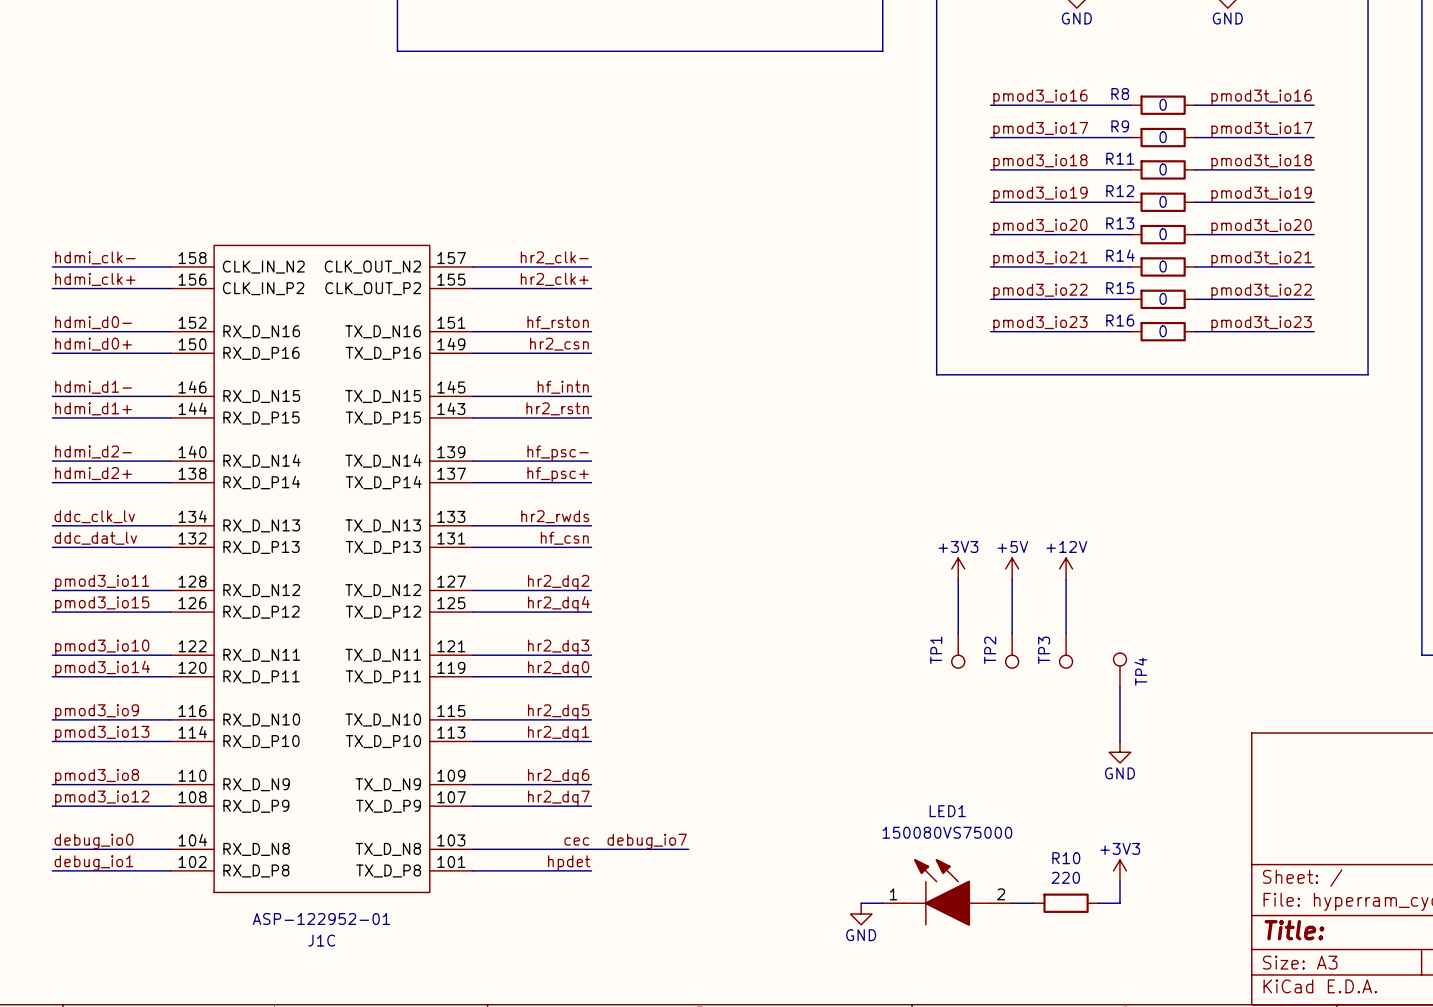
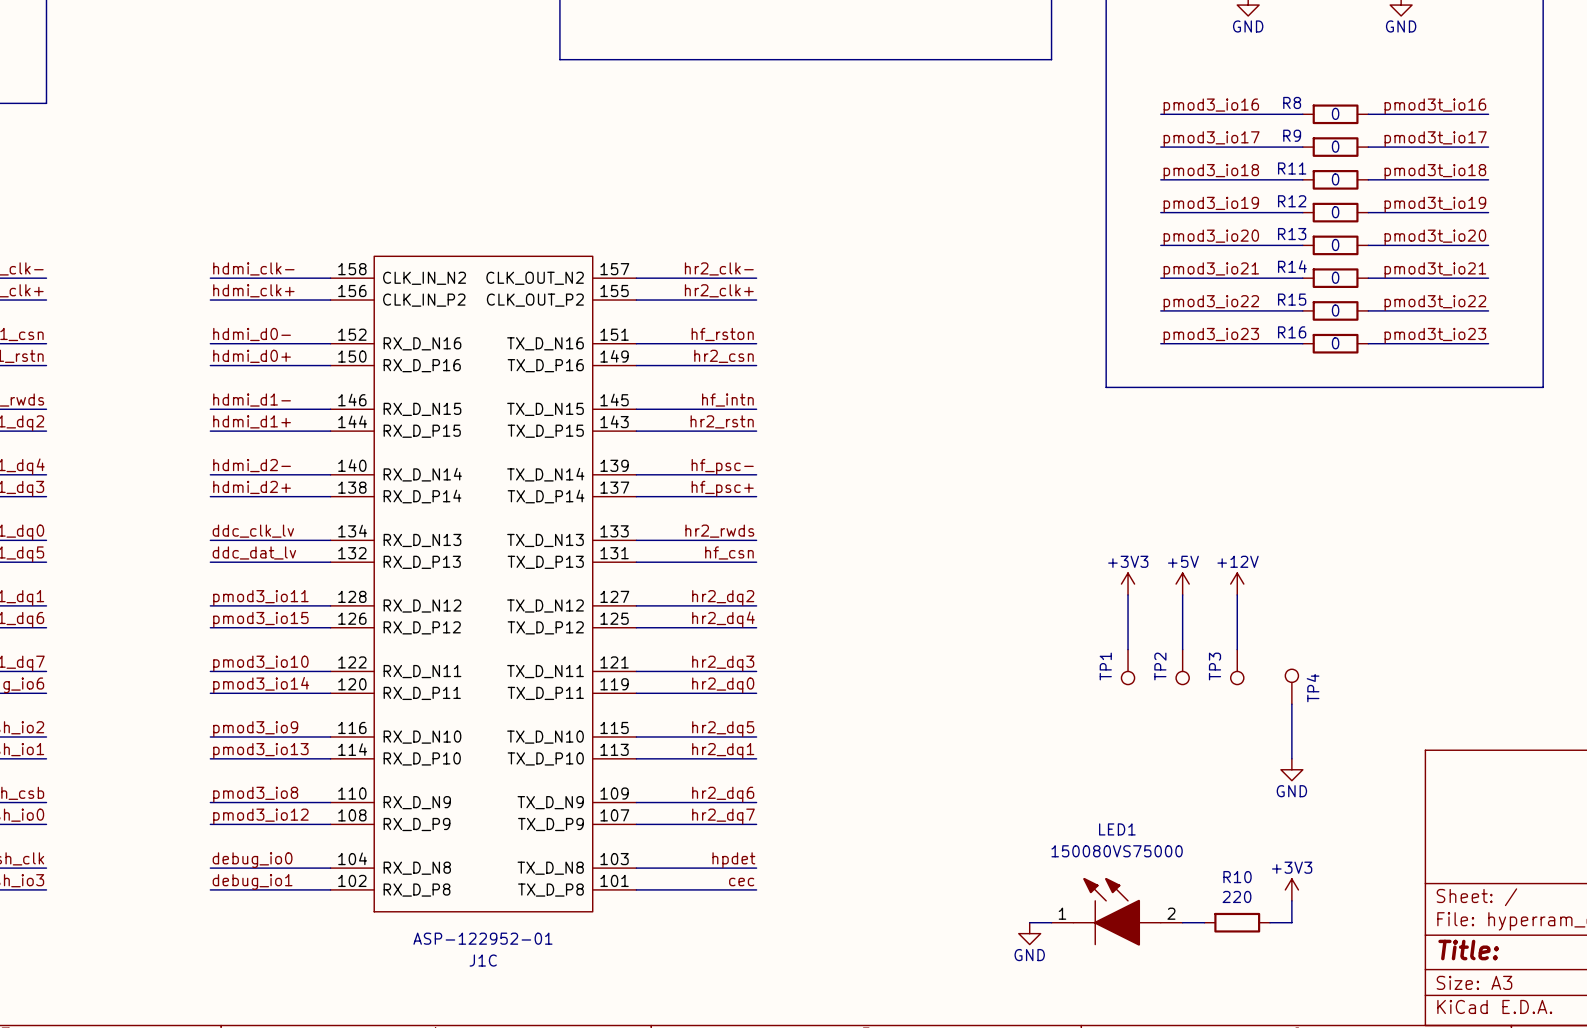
label: cec (576, 841) -> hpdet (733, 860)
label: debug_io7 (647, 841) -> none
wire: (591, 849) (688, 849) -> none
label: hpdet (569, 863) -> cec (741, 882)

